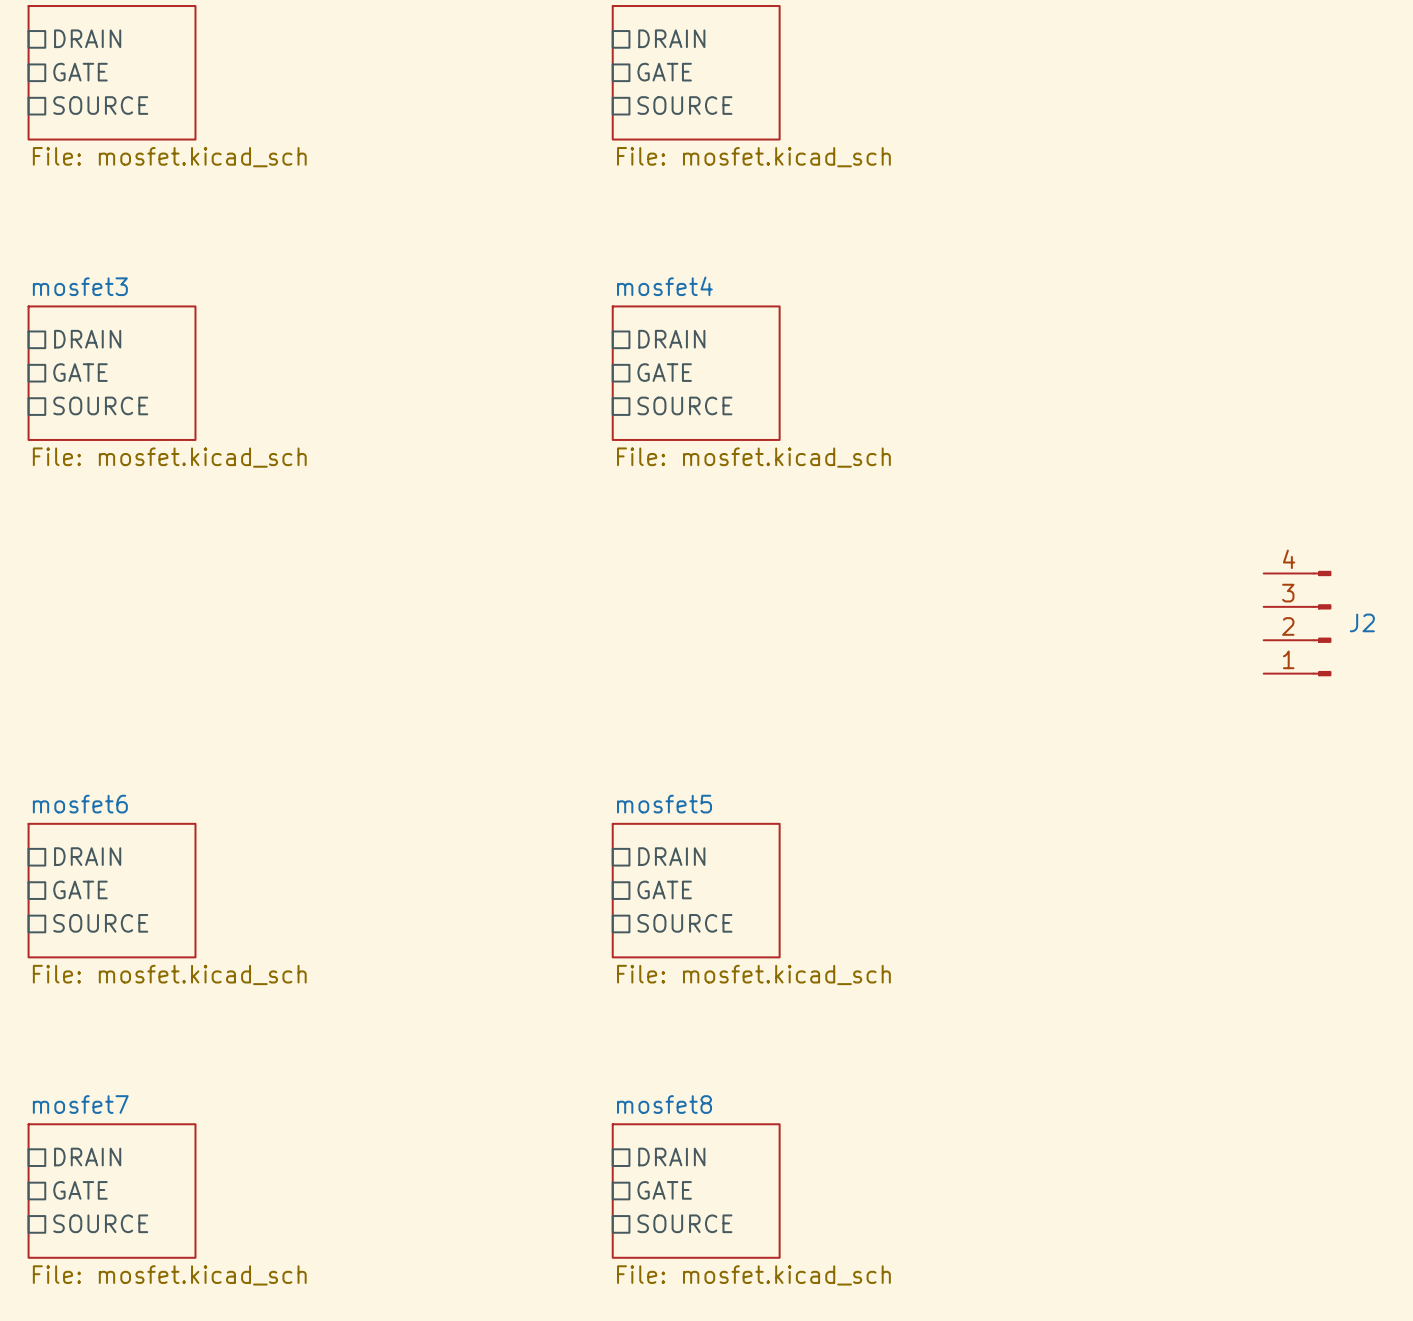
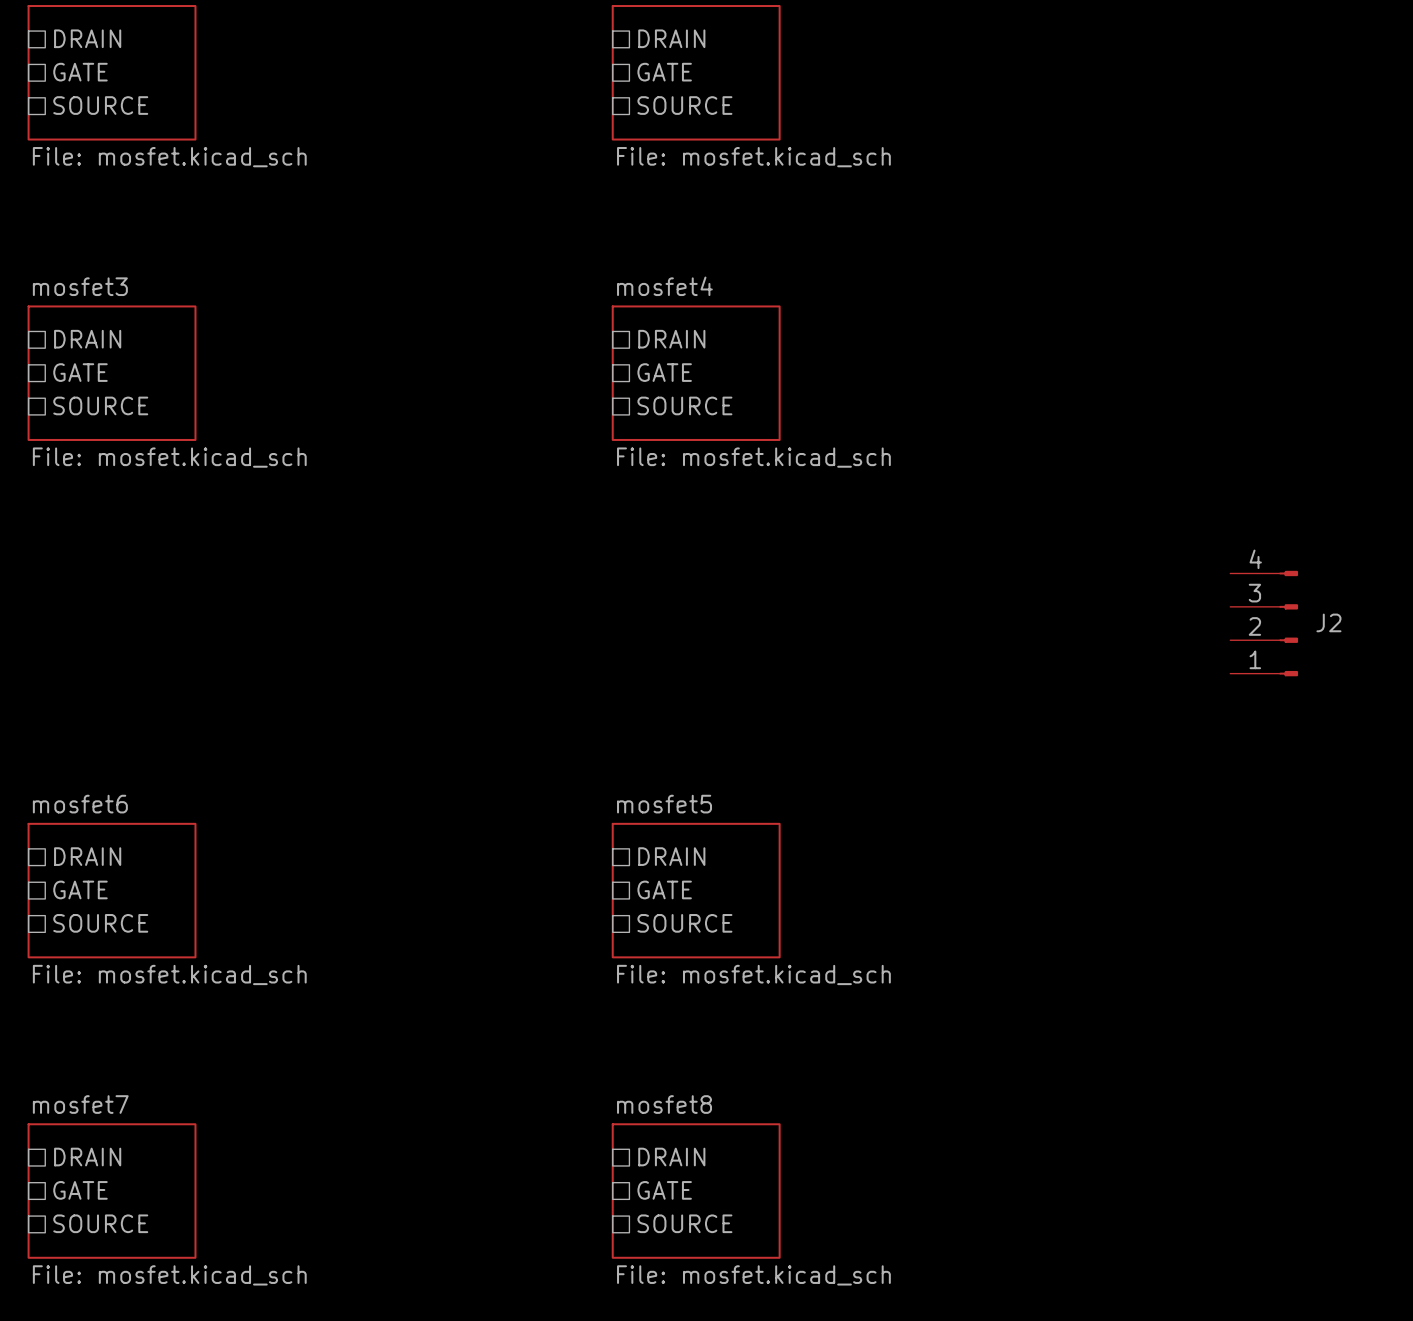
J2 position: (1297, 623) -> (1264, 623)

